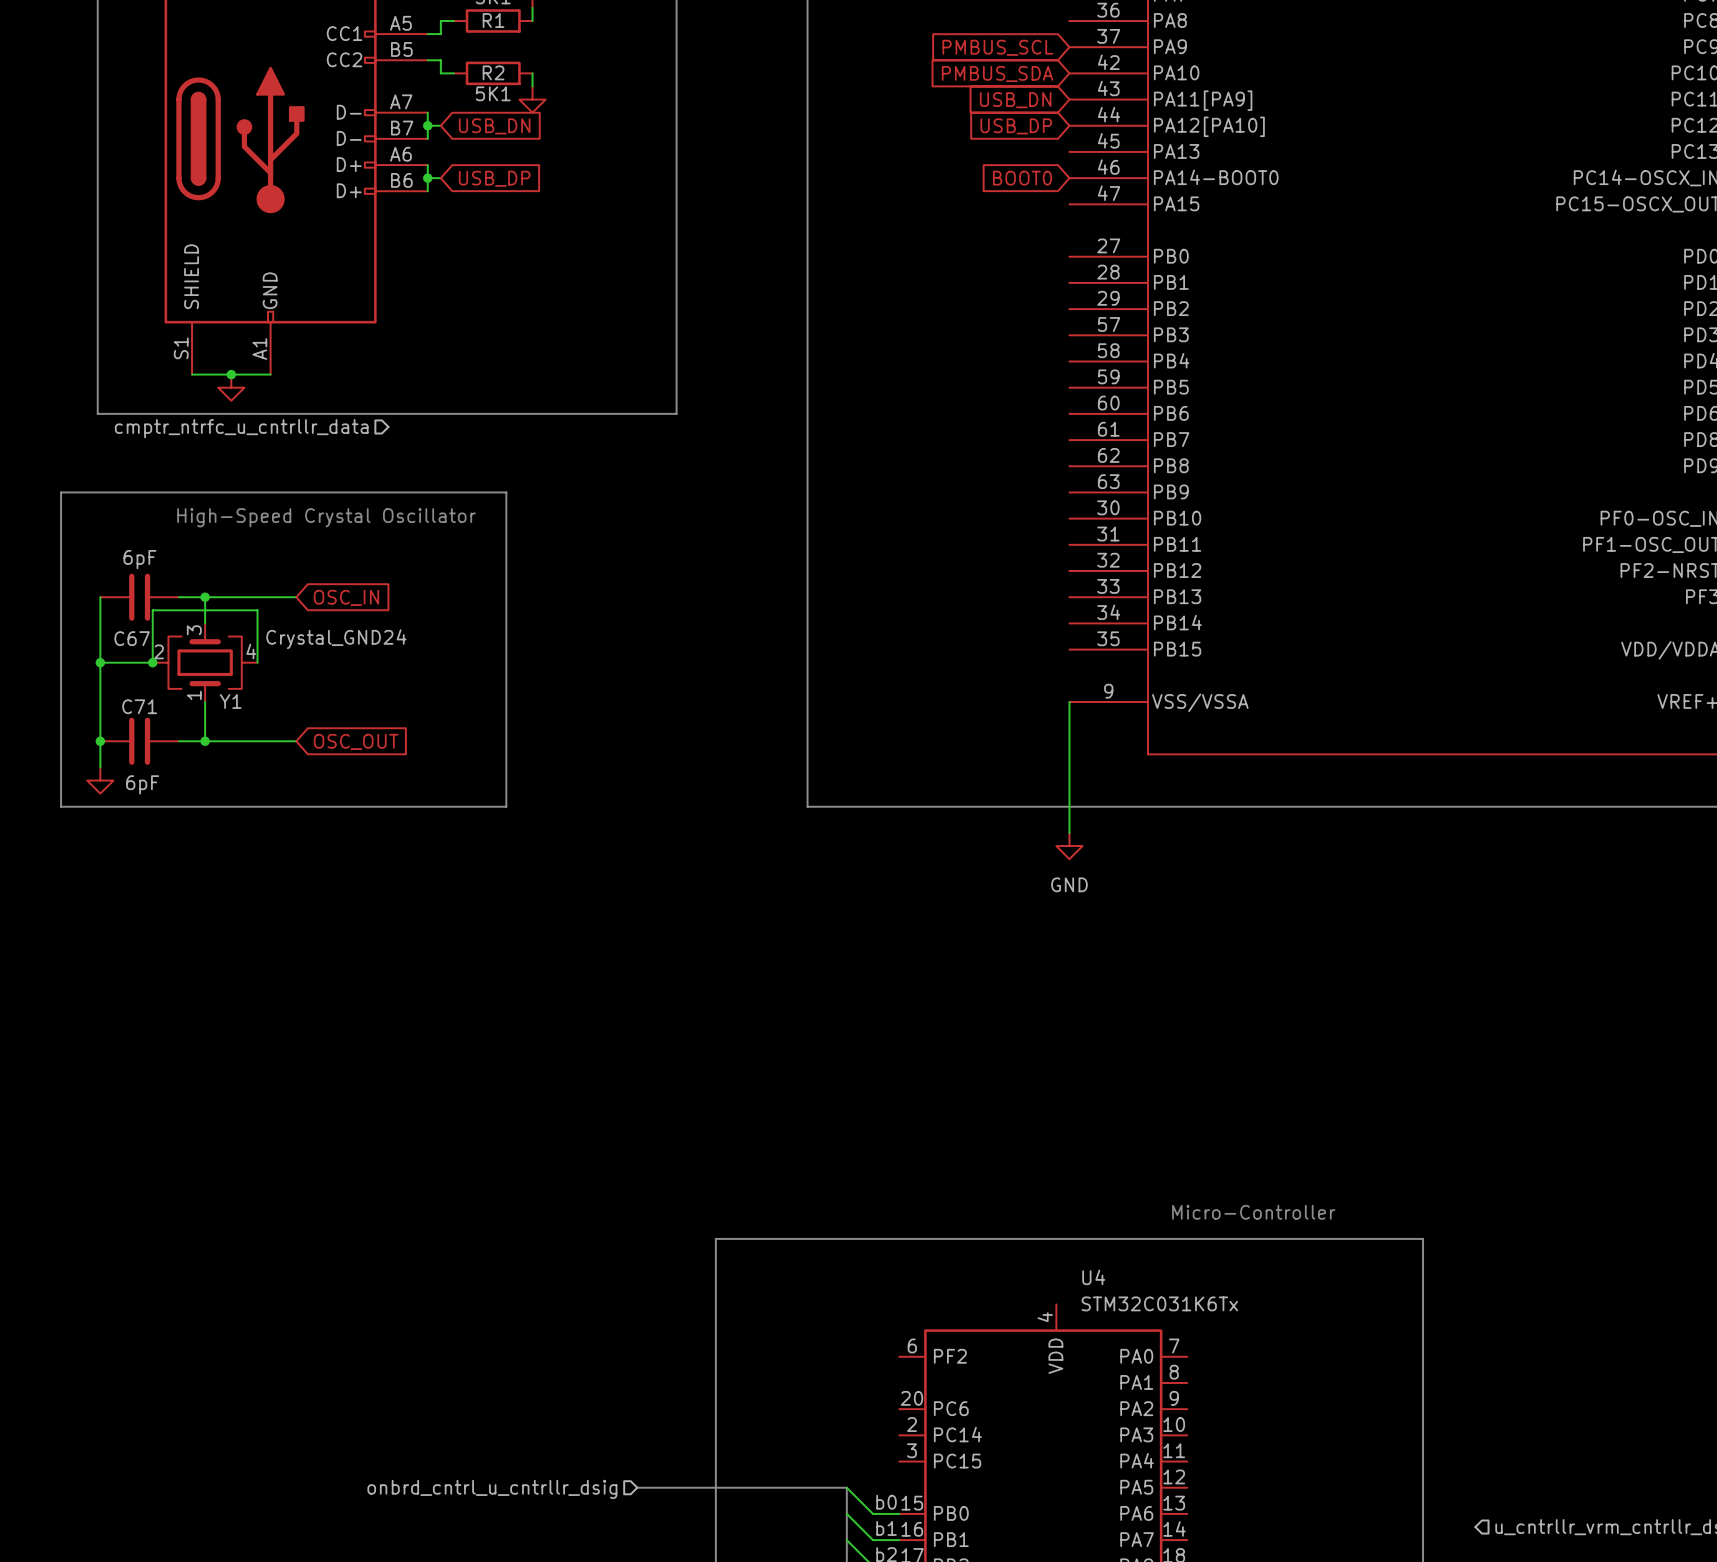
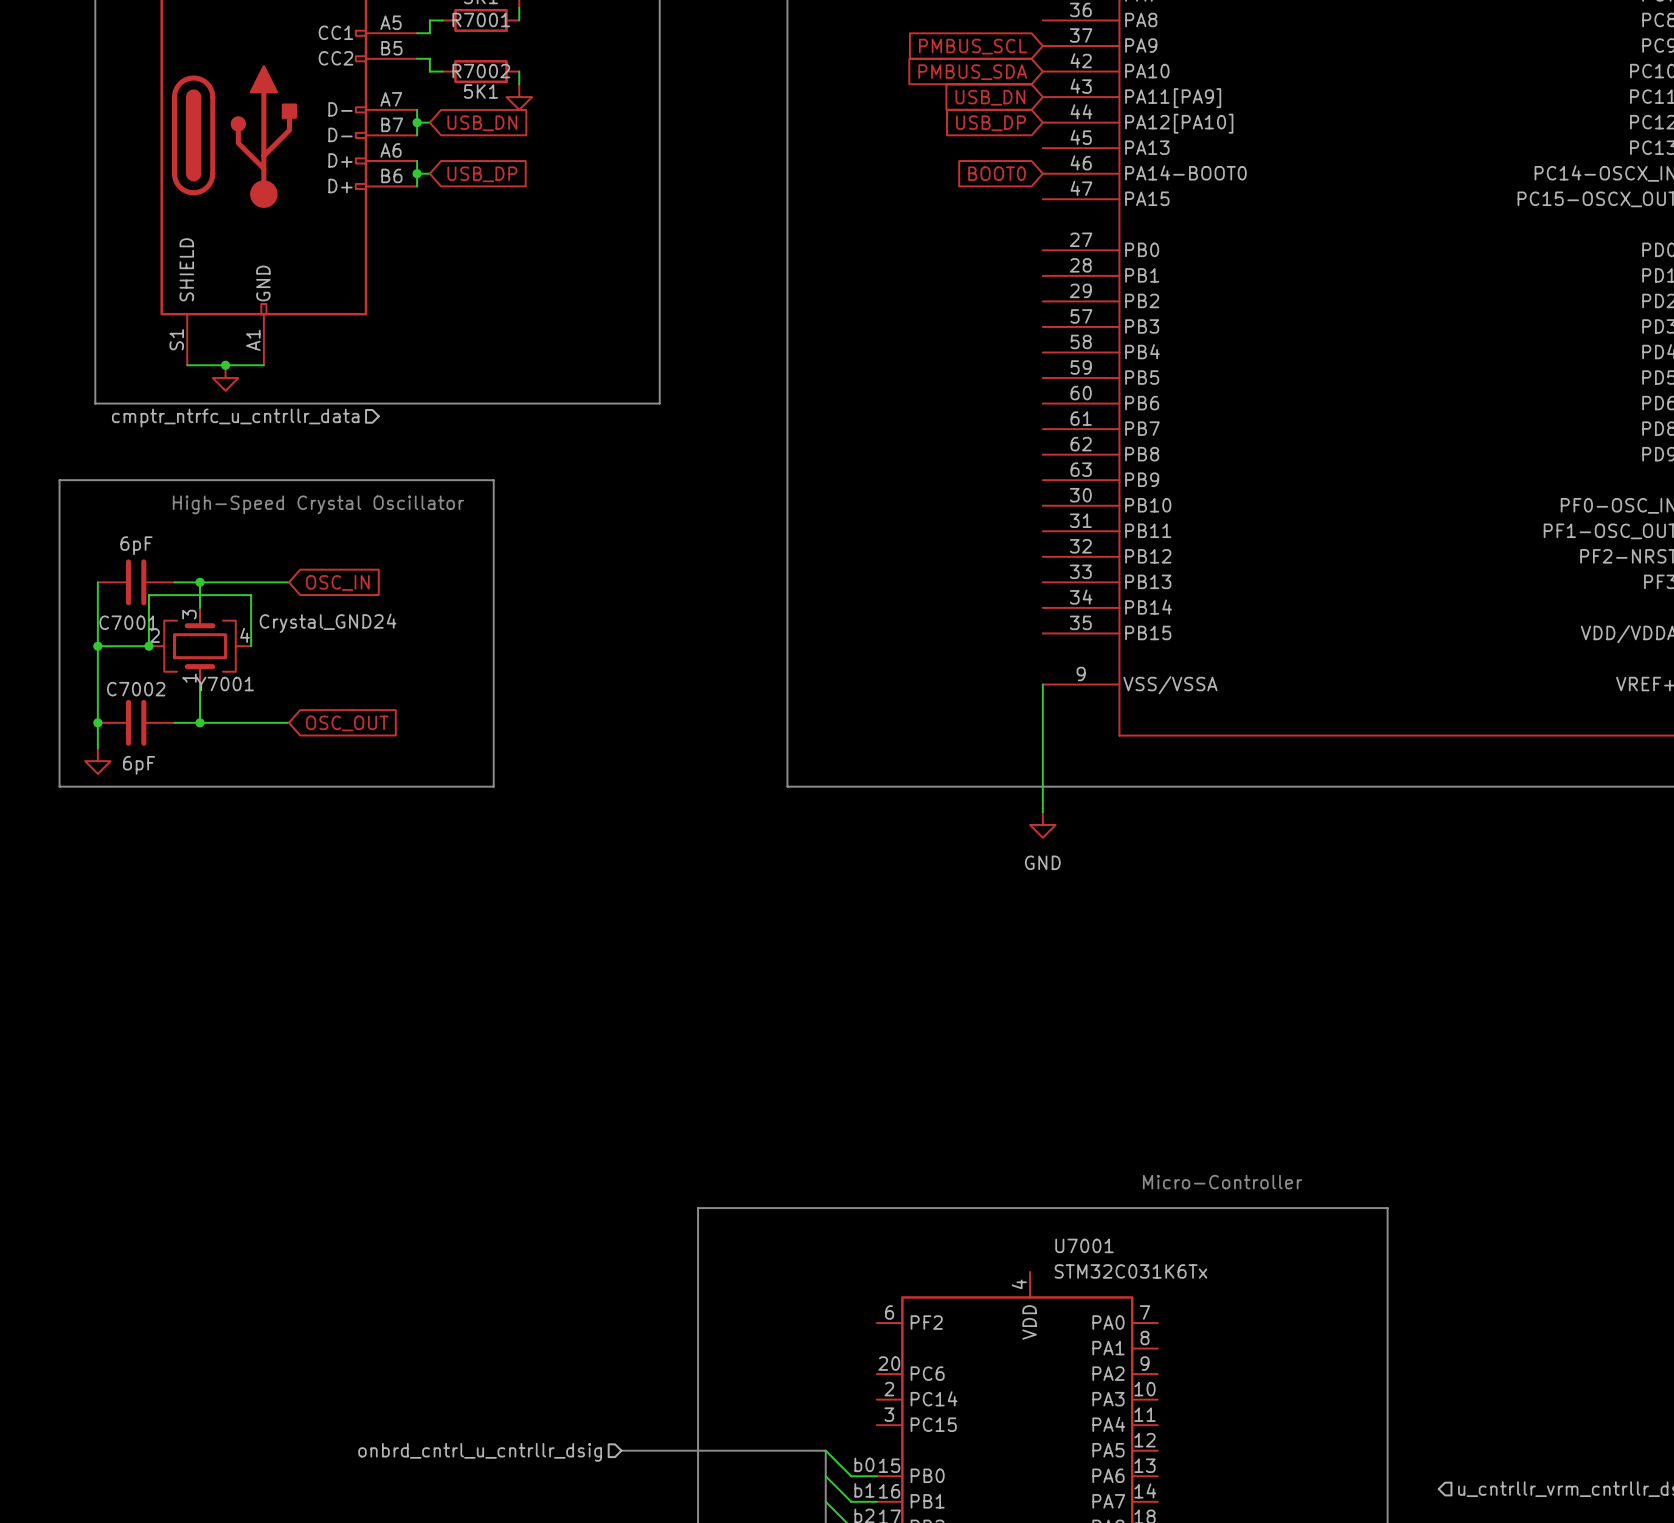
R1 name: R1 (493, 20) -> R7001 (481, 19)
R2 name: R2 (493, 72) -> R7002 (481, 71)
C67 name: C67 (132, 638) -> C7001 (128, 622)
Y1 name: Y1 (230, 701) -> Y7001 (224, 684)
C71 name: C71 (139, 706) -> C7002 (136, 689)
U4 name: U4 (1093, 1277) -> U7001 (1084, 1245)

